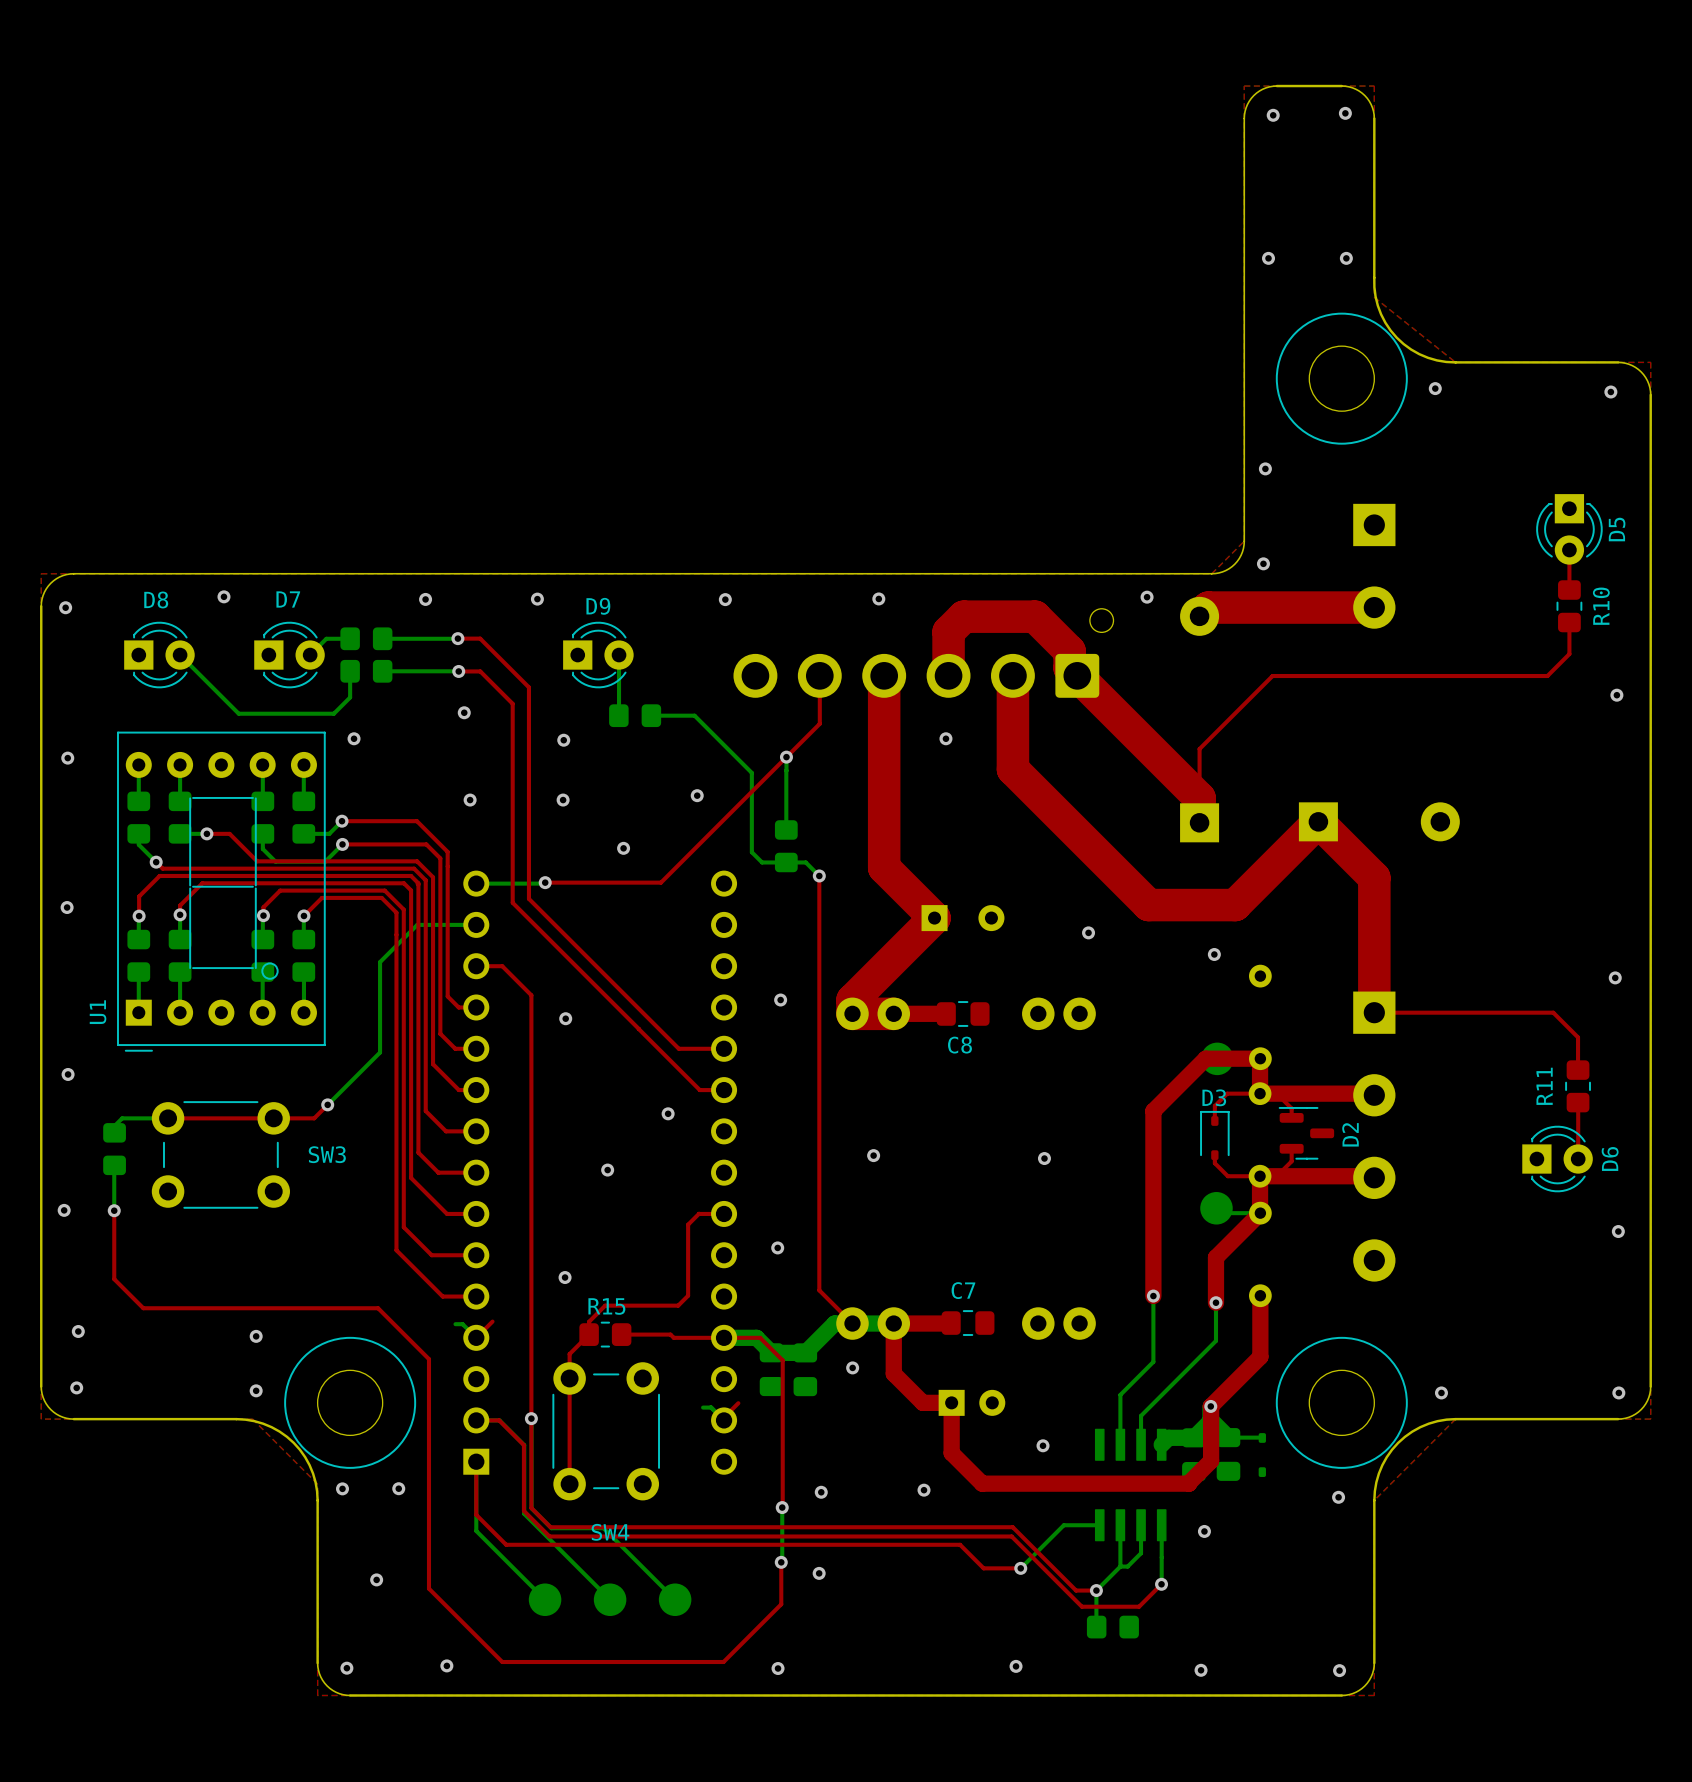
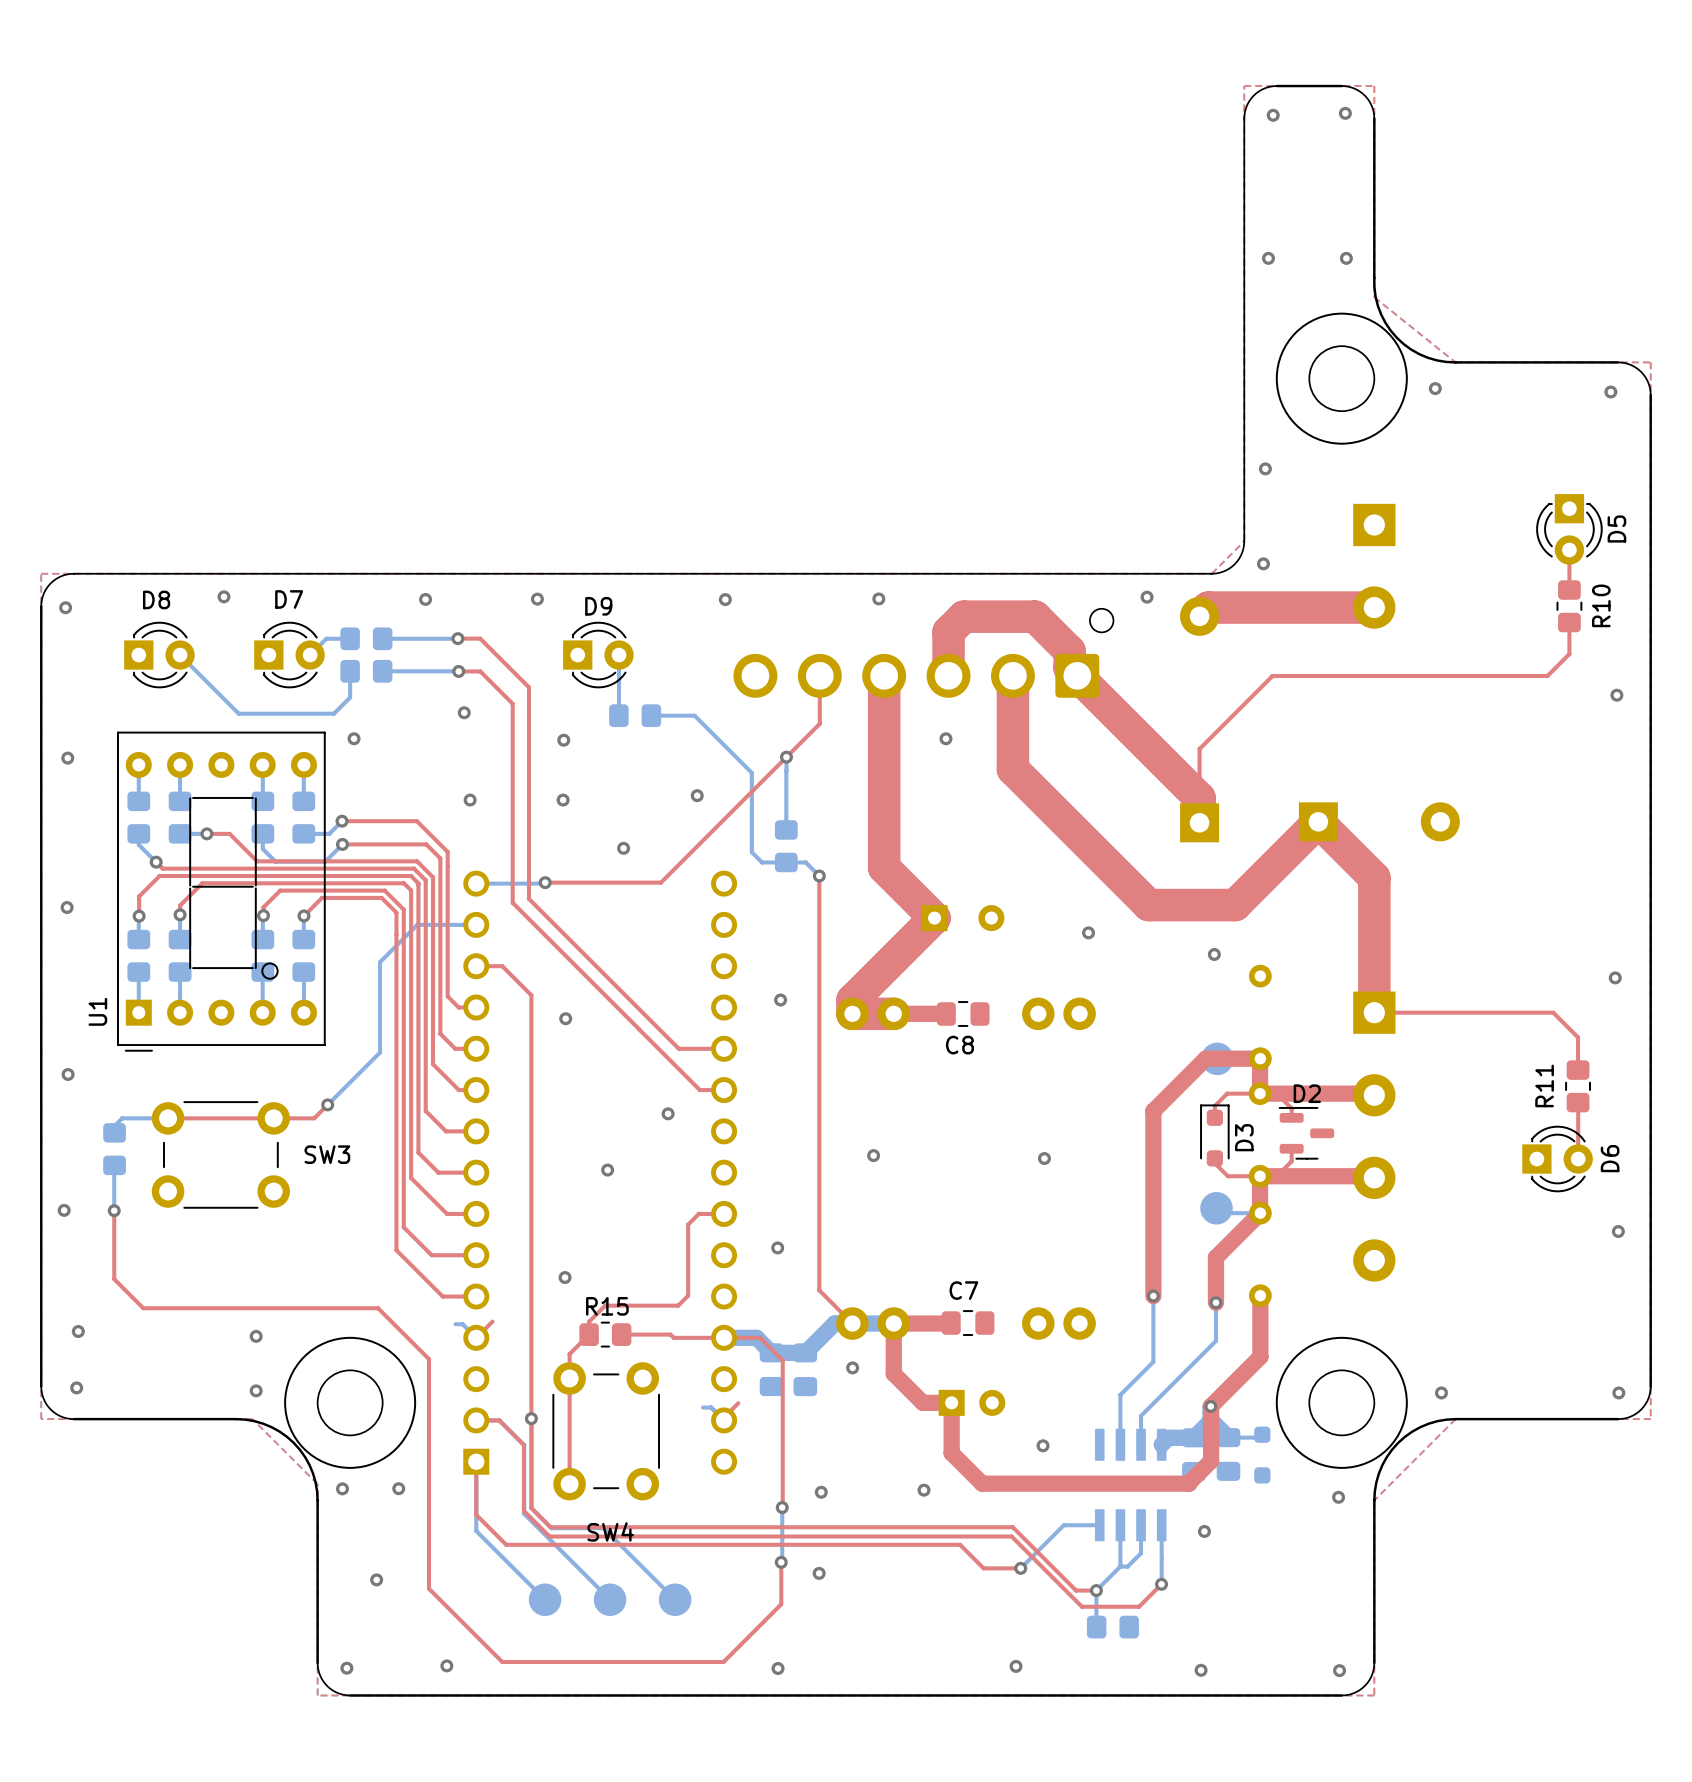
D3 name rotation: 0° (1214, 1097) -> 90° counterclockwise (1244, 1137)
D3 name position: D3 (1214, 1097) -> D3 (1244, 1137)
D3 footprint: [1200, 1110, 1230, 1161] -> [1200, 1104, 1230, 1167]
D2 name rotation: 0° (1350, 1134) -> 90° clockwise (1307, 1093)
D2 name position: D2 (1350, 1134) -> D2 (1307, 1093)
part footprint: [1258, 1433, 1266, 1478] -> [1254, 1426, 1271, 1484]

